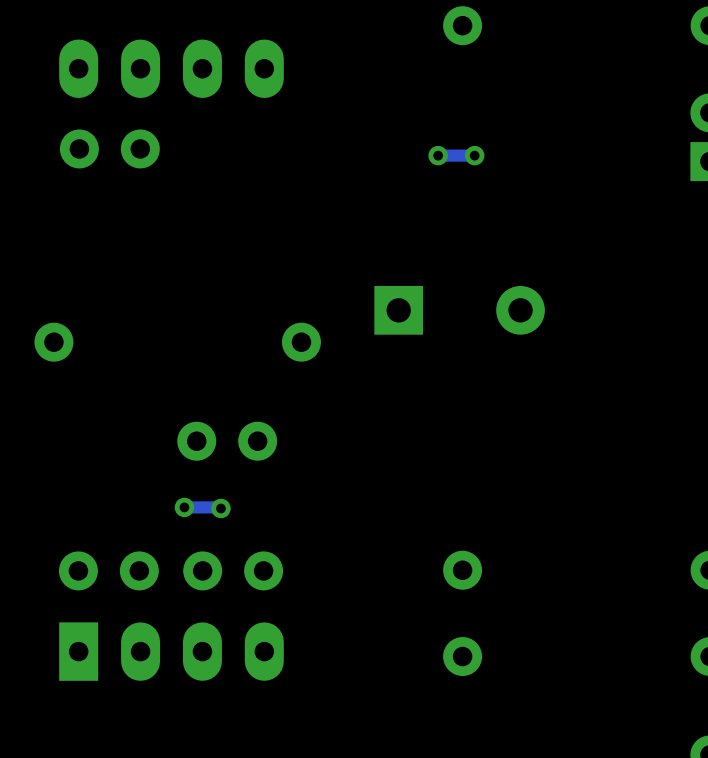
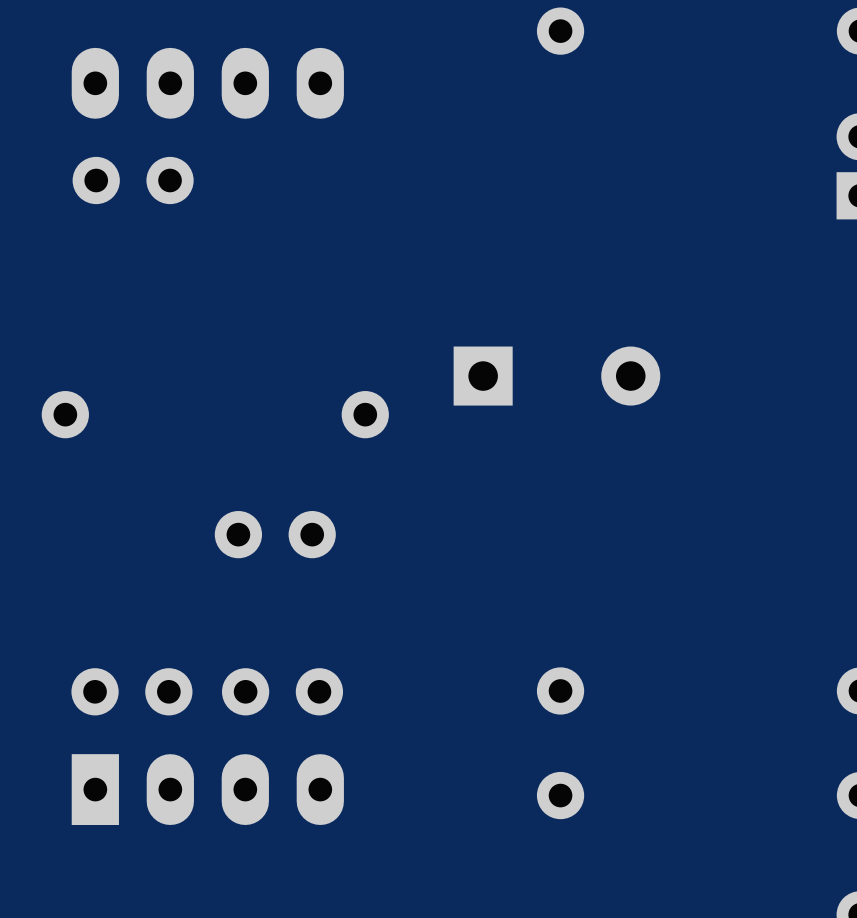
via: (438, 155) -> none
track: (474, 155) (438, 155) -> none
via: (474, 155) -> none
track: (184, 507) (220, 508) -> none
via: (184, 507) -> none
via: (220, 508) -> none

